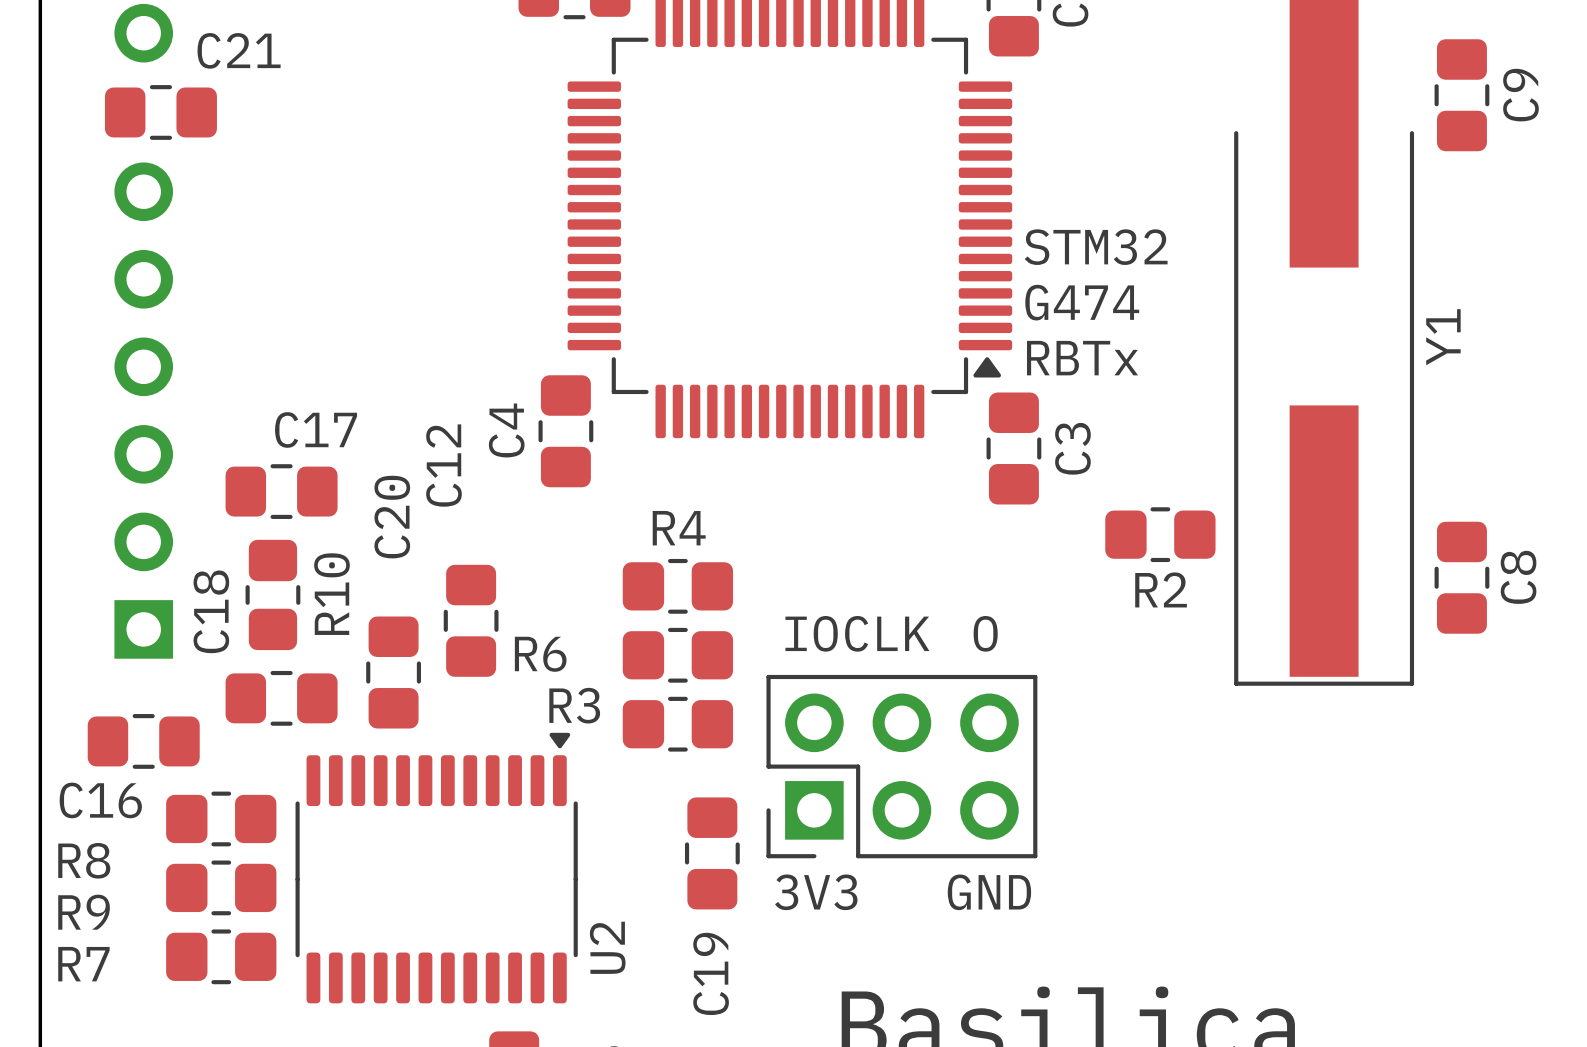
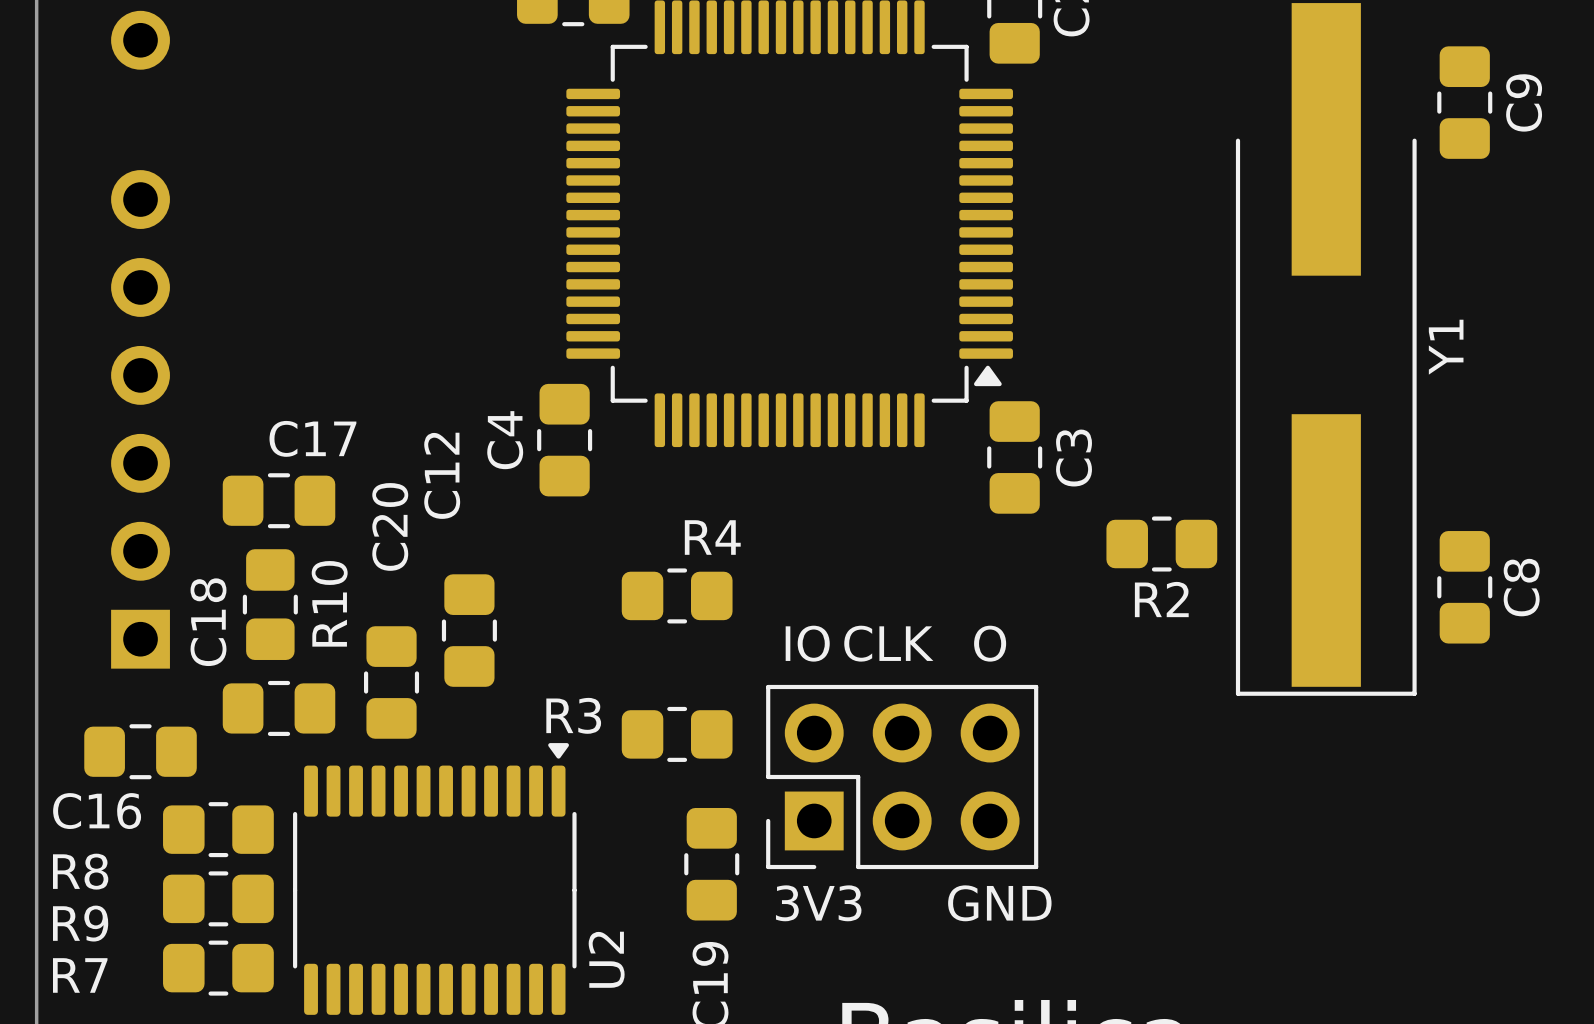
C21: (160, 112) -> none
text: STM32 (1096, 247) -> none
text: G474 (1082, 302) -> none
text: RBTx (1082, 358) -> none
R4 name position: R4 (679, 528) -> R4 (712, 537)
R6: (677, 655) -> none

